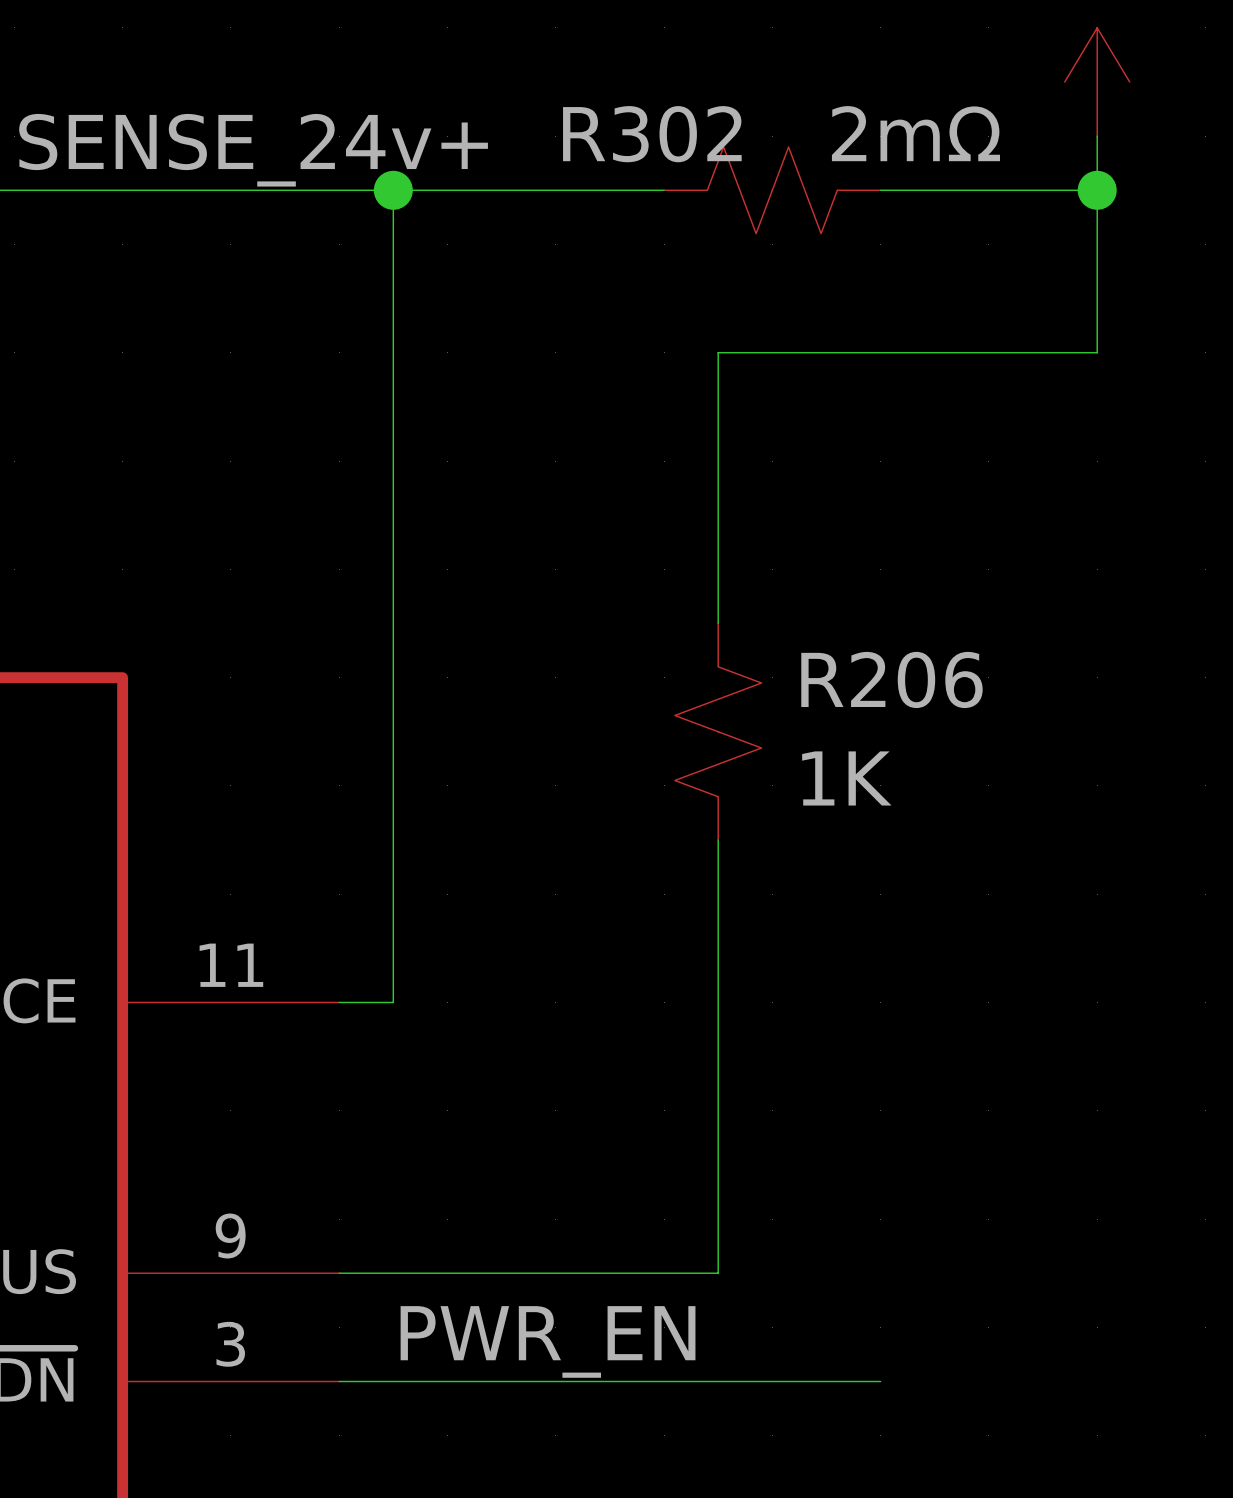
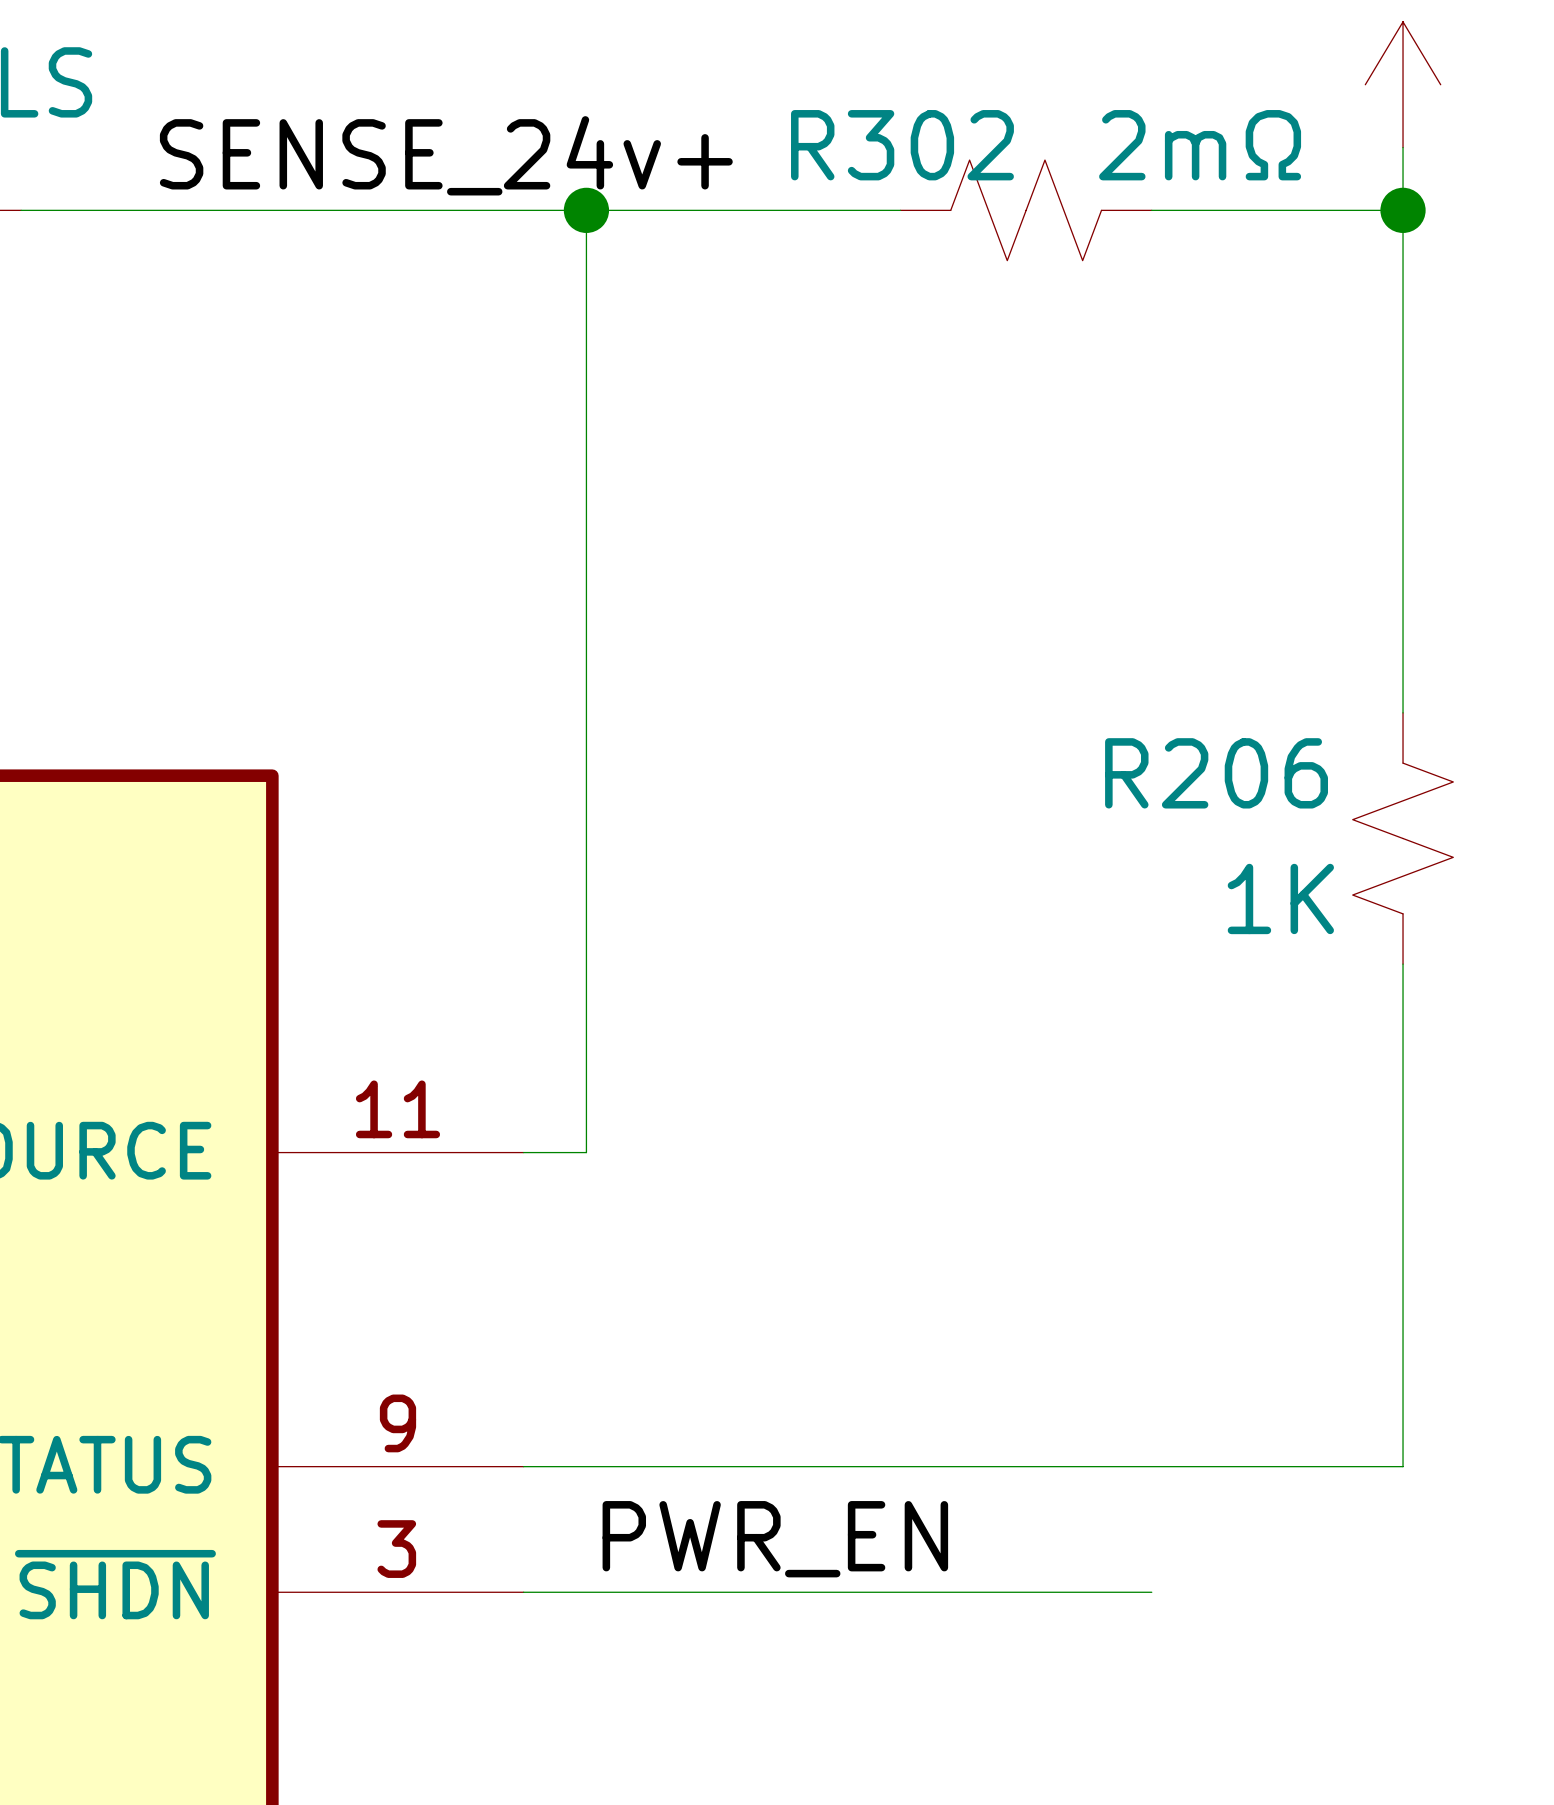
wire: (1097, 352) (718, 352) (718, 623) -> (1403, 398) (1403, 712)
R206 name position: R206 (891, 679) -> R206 (1216, 773)
R206 position: (718, 731) -> (1403, 838)
R206 value position: 1K (846, 778) -> 1K (1280, 898)
wire: (718, 840) (718, 1273) -> (1403, 964) (1403, 1466) (963, 1466)

